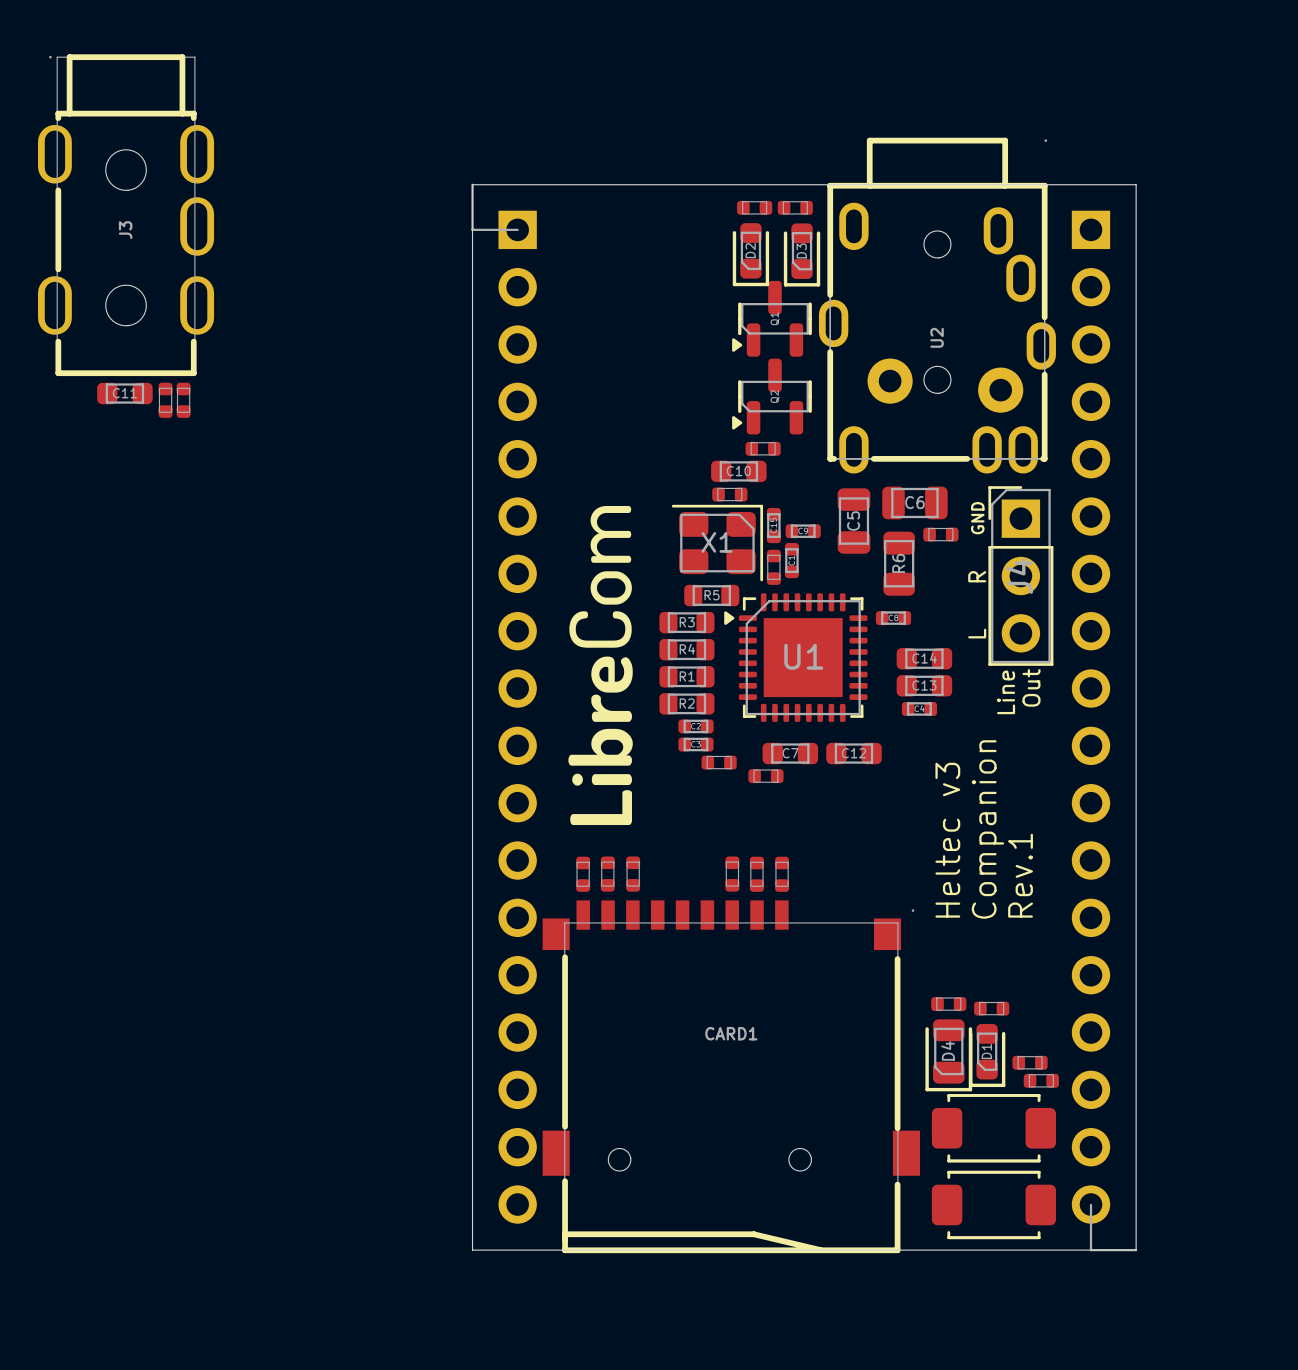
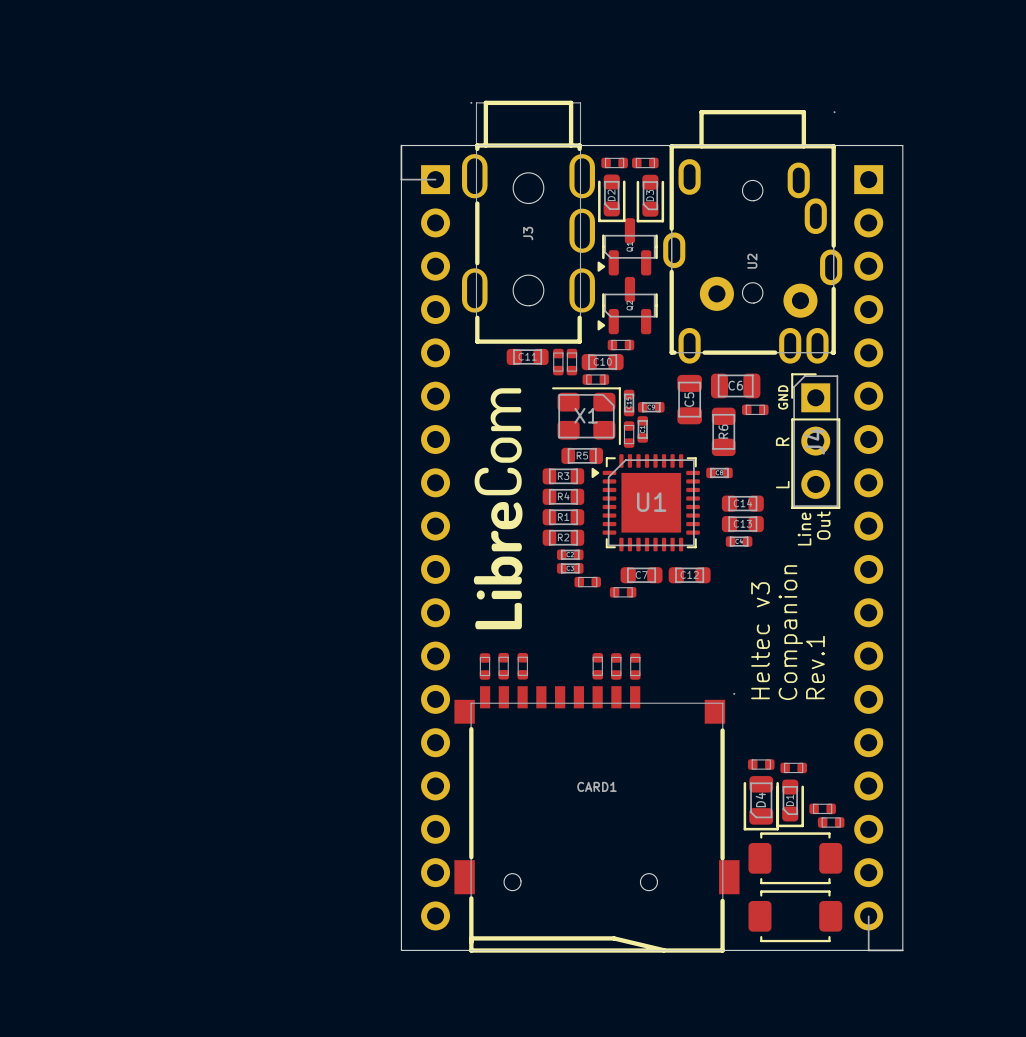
J3 position: (126, 215) -> (528, 222)
C11 position: (124, 393) -> (527, 356)
part: (165, 400) -> none
part: (183, 400) -> none
part: none -> (558, 362)
part: none -> (571, 362)

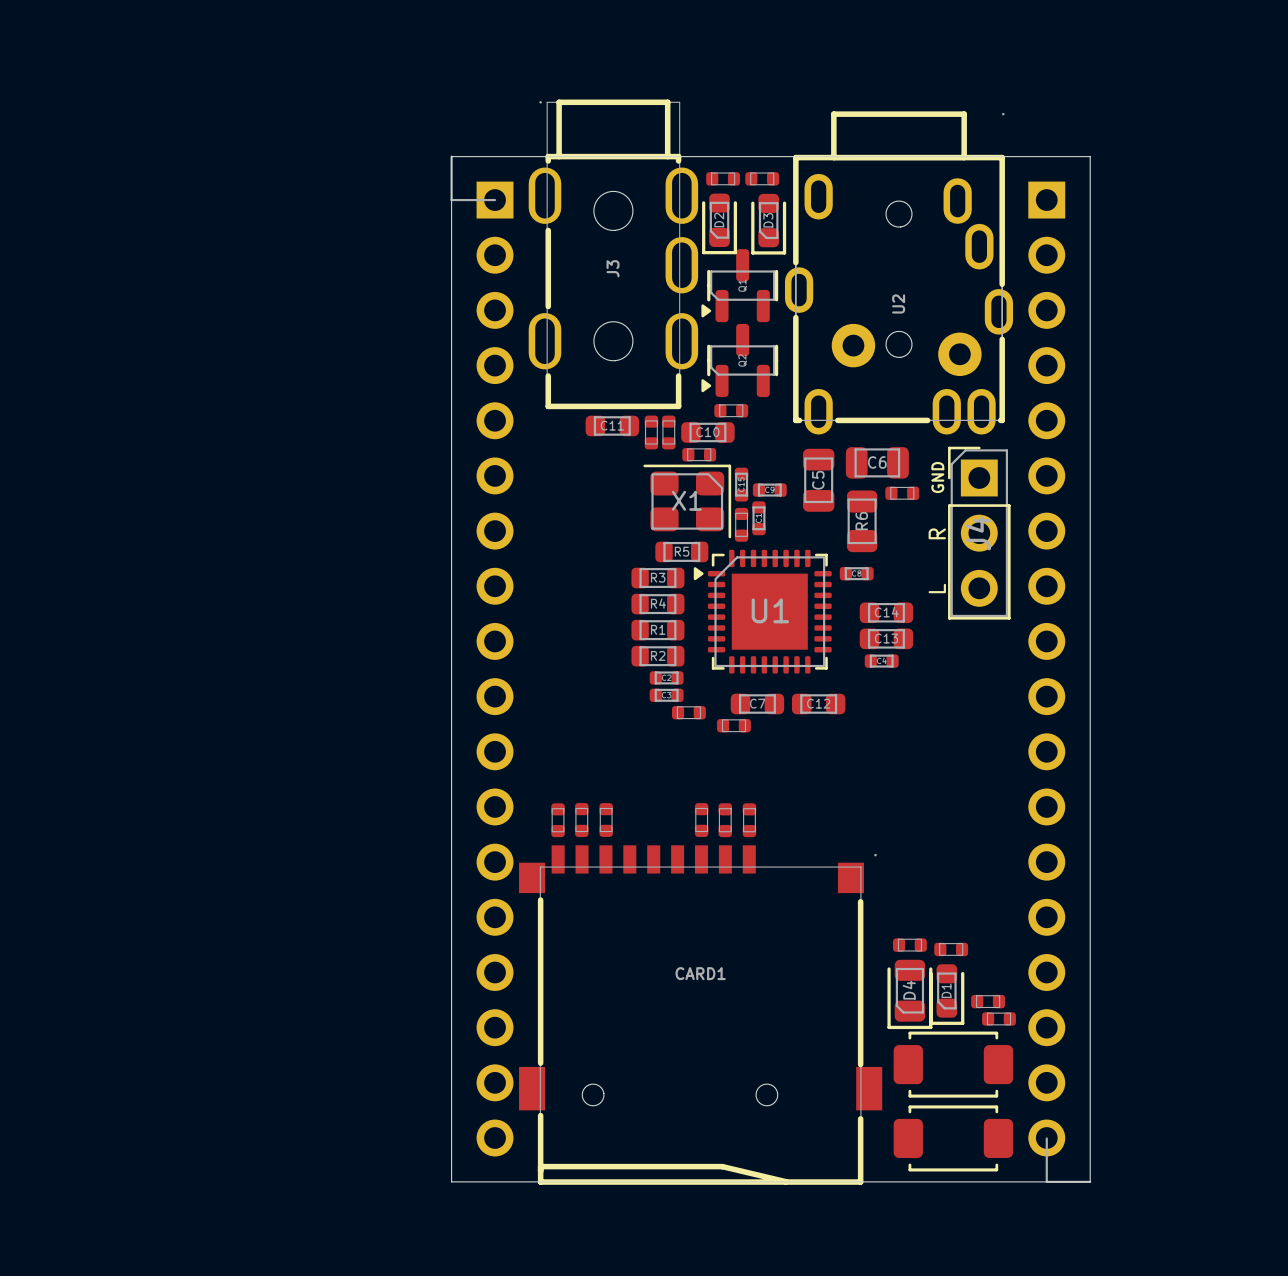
drawing: [473, 388, 523, 630] -> none
text: Out (823, 525) -> none
text: Line (804, 529) -> none
text: Companion (790, 632) -> none
text: Heltec v3 (760, 640) -> none
text: Rev.1 (815, 667) -> none

